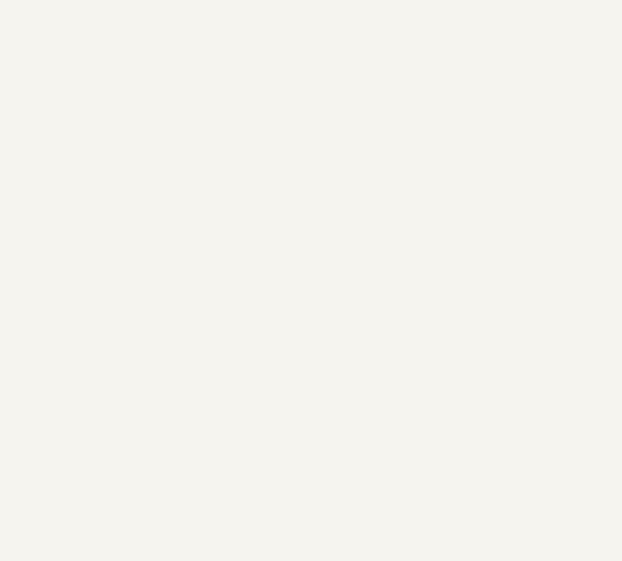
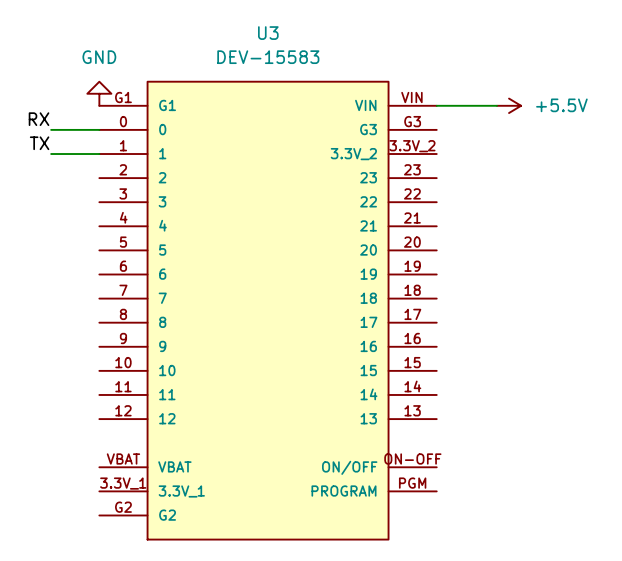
power symbol: none -> GND (99, 93)
wire: none -> (436, 105) (496, 105)
power symbol: none -> +5.5V (509, 105)
label: none -> RX (39, 119)
wire: none -> (51, 129) (99, 129)
label: none -> TX (39, 143)
wire: none -> (51, 154) (99, 154)
U3: none -> DEV-15583 (268, 310)

